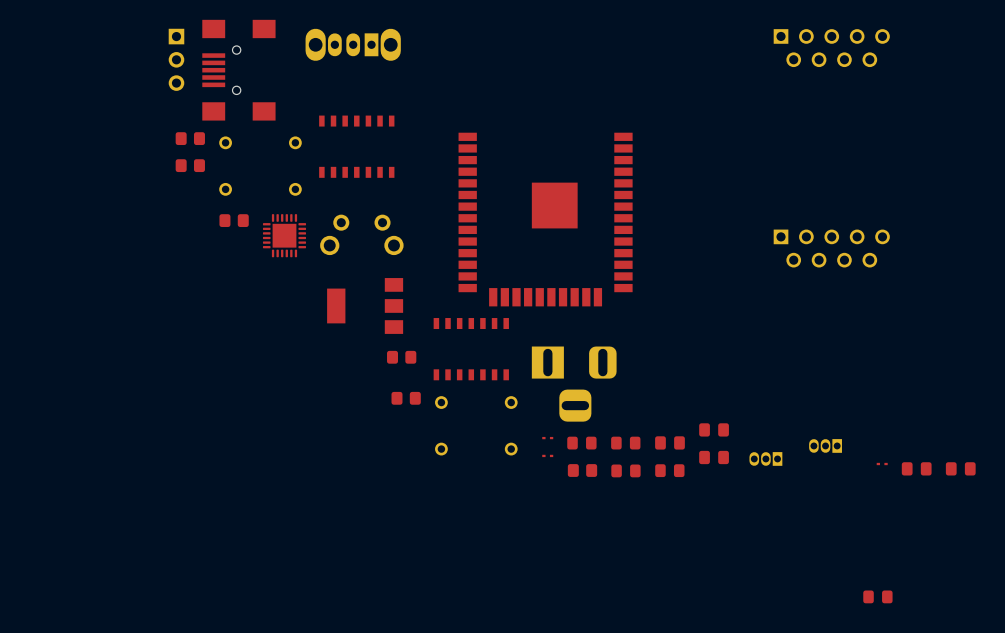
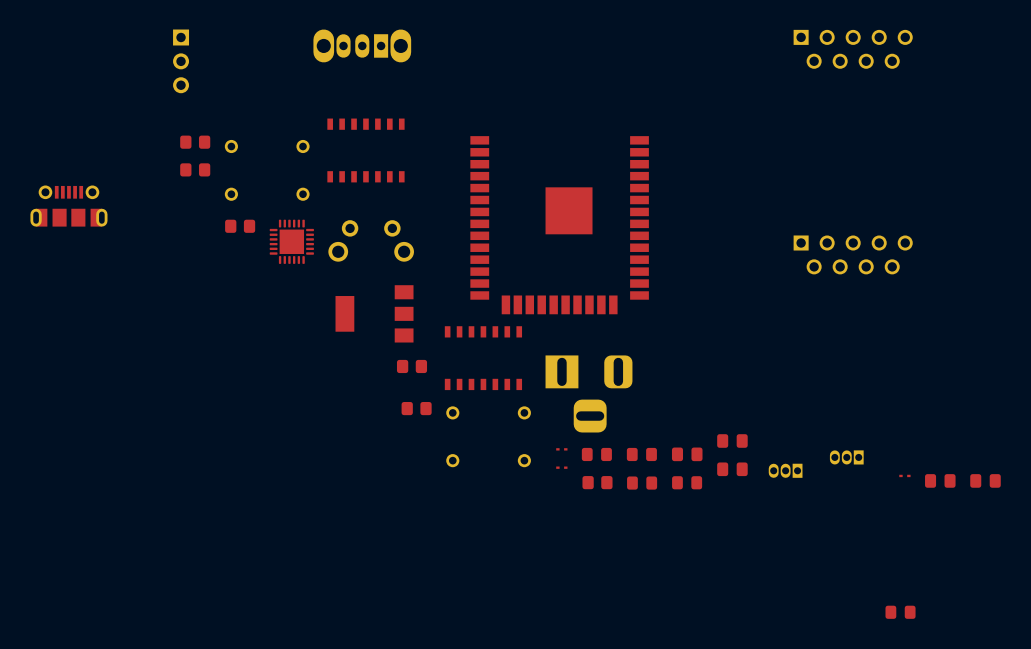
part: (238, 70) -> none
part: none -> (68, 206)

